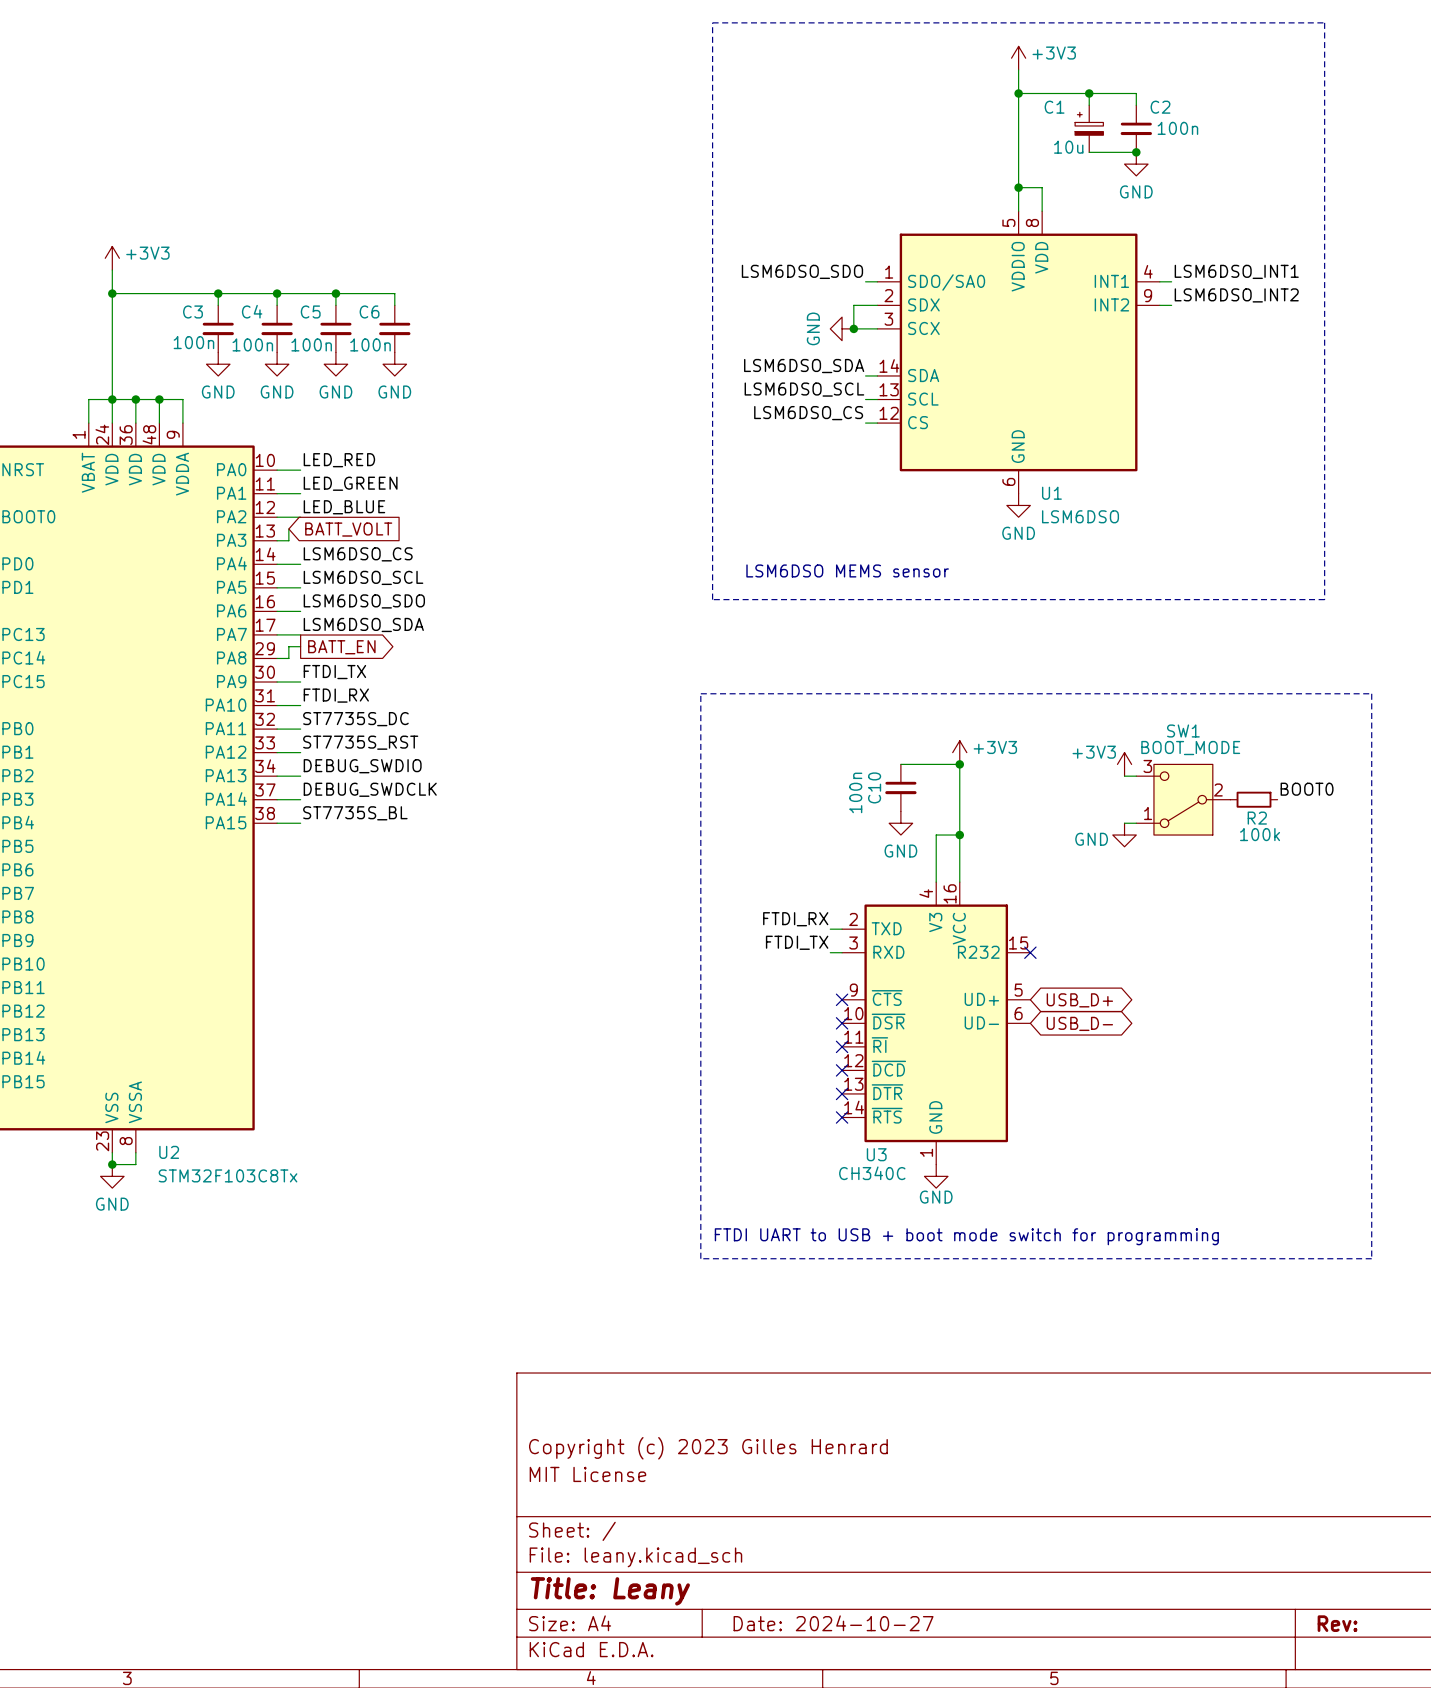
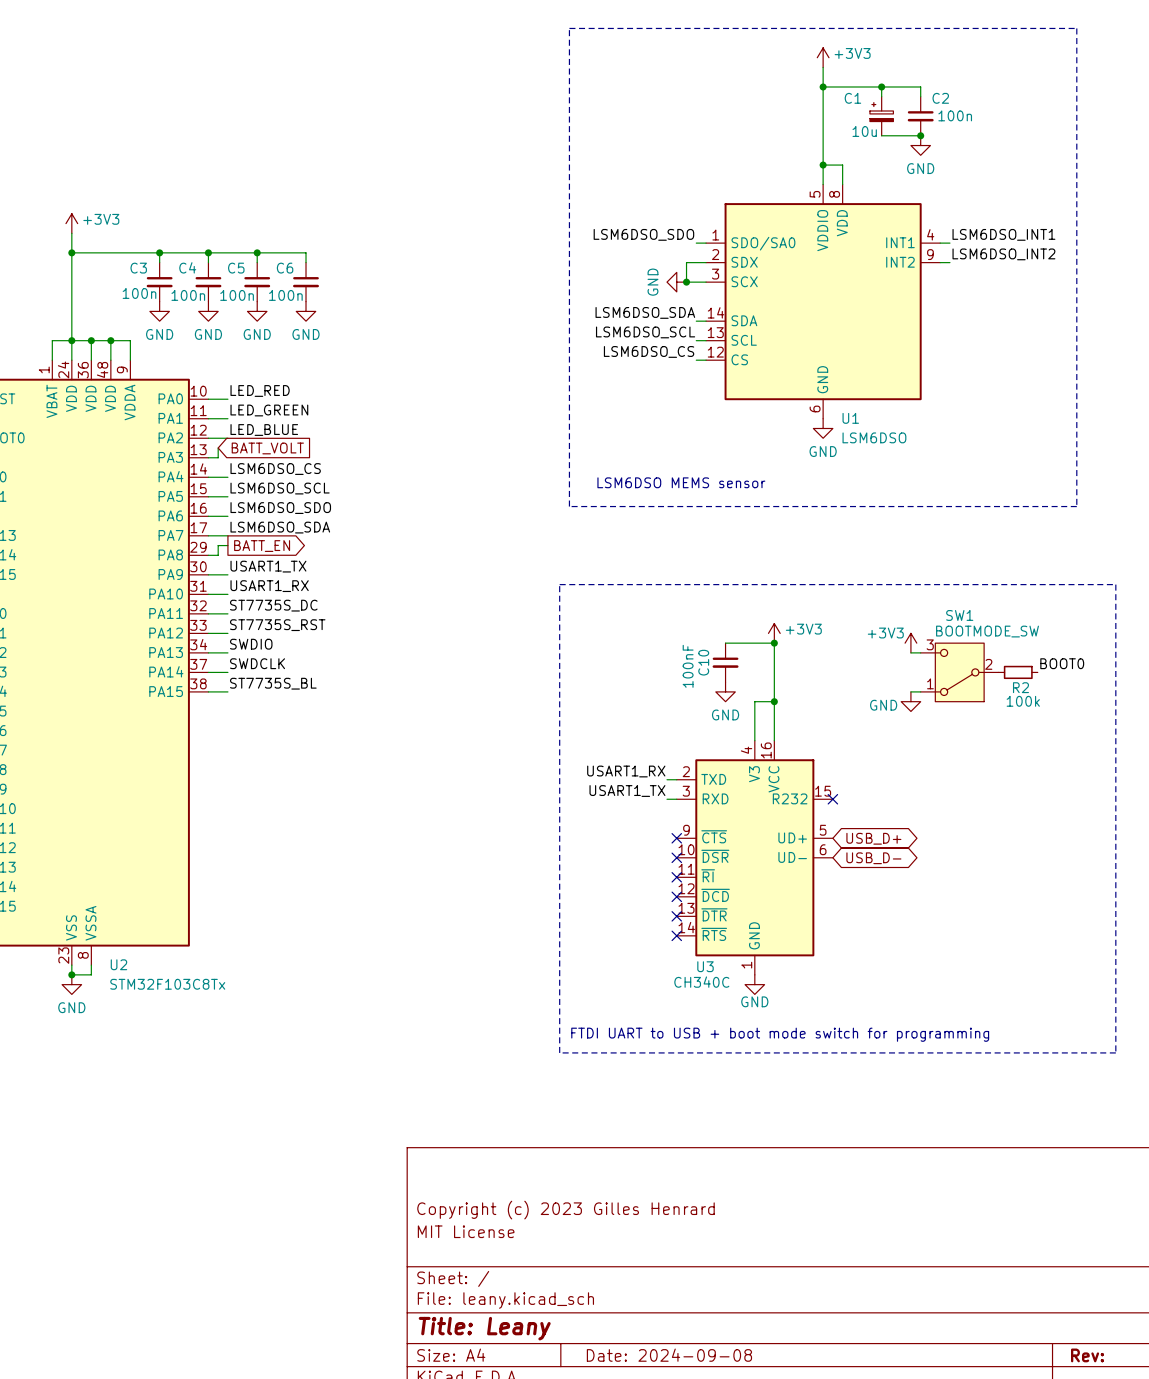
label: FTDI_TX (334, 672) -> USART1_TX (268, 566)
label: FTDI_RX (336, 695) -> USART1_RX (269, 586)
SW1 value: BOOT_MODE (1190, 748) -> BOOTMODE_SW (987, 631)
label: DEBUG_SWDIO (362, 766) -> SWDIO (251, 644)
label: DEBUG_SWDCLK (370, 789) -> SWDCLK (257, 663)
C10 value: 100n (855, 792) -> 100nF (688, 666)
label: FTDI_RX (795, 919) -> USART1_RX (626, 771)
label: FTDI_TX (797, 942) -> USART1_TX (627, 791)
title block: Date: 2024-10-27 (833, 1623) -> Date: 2024-09-08 (669, 1355)

